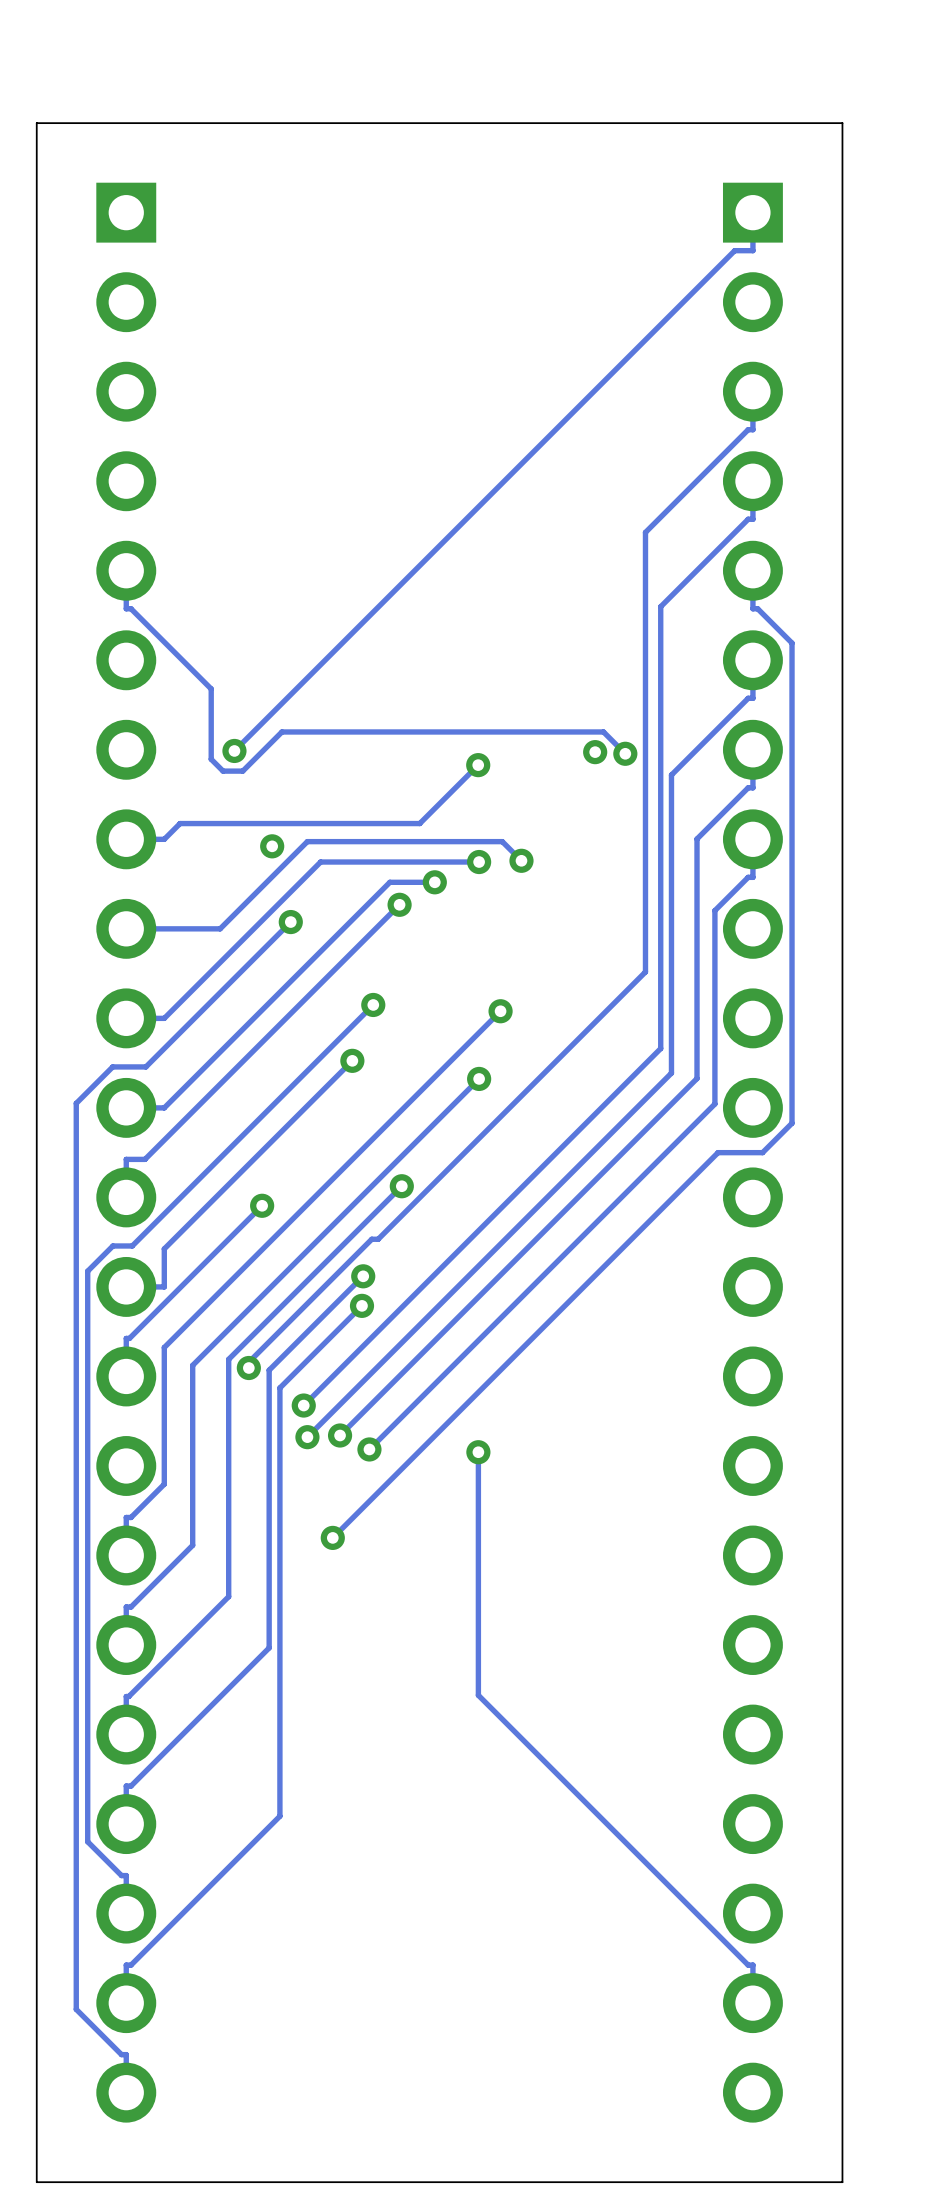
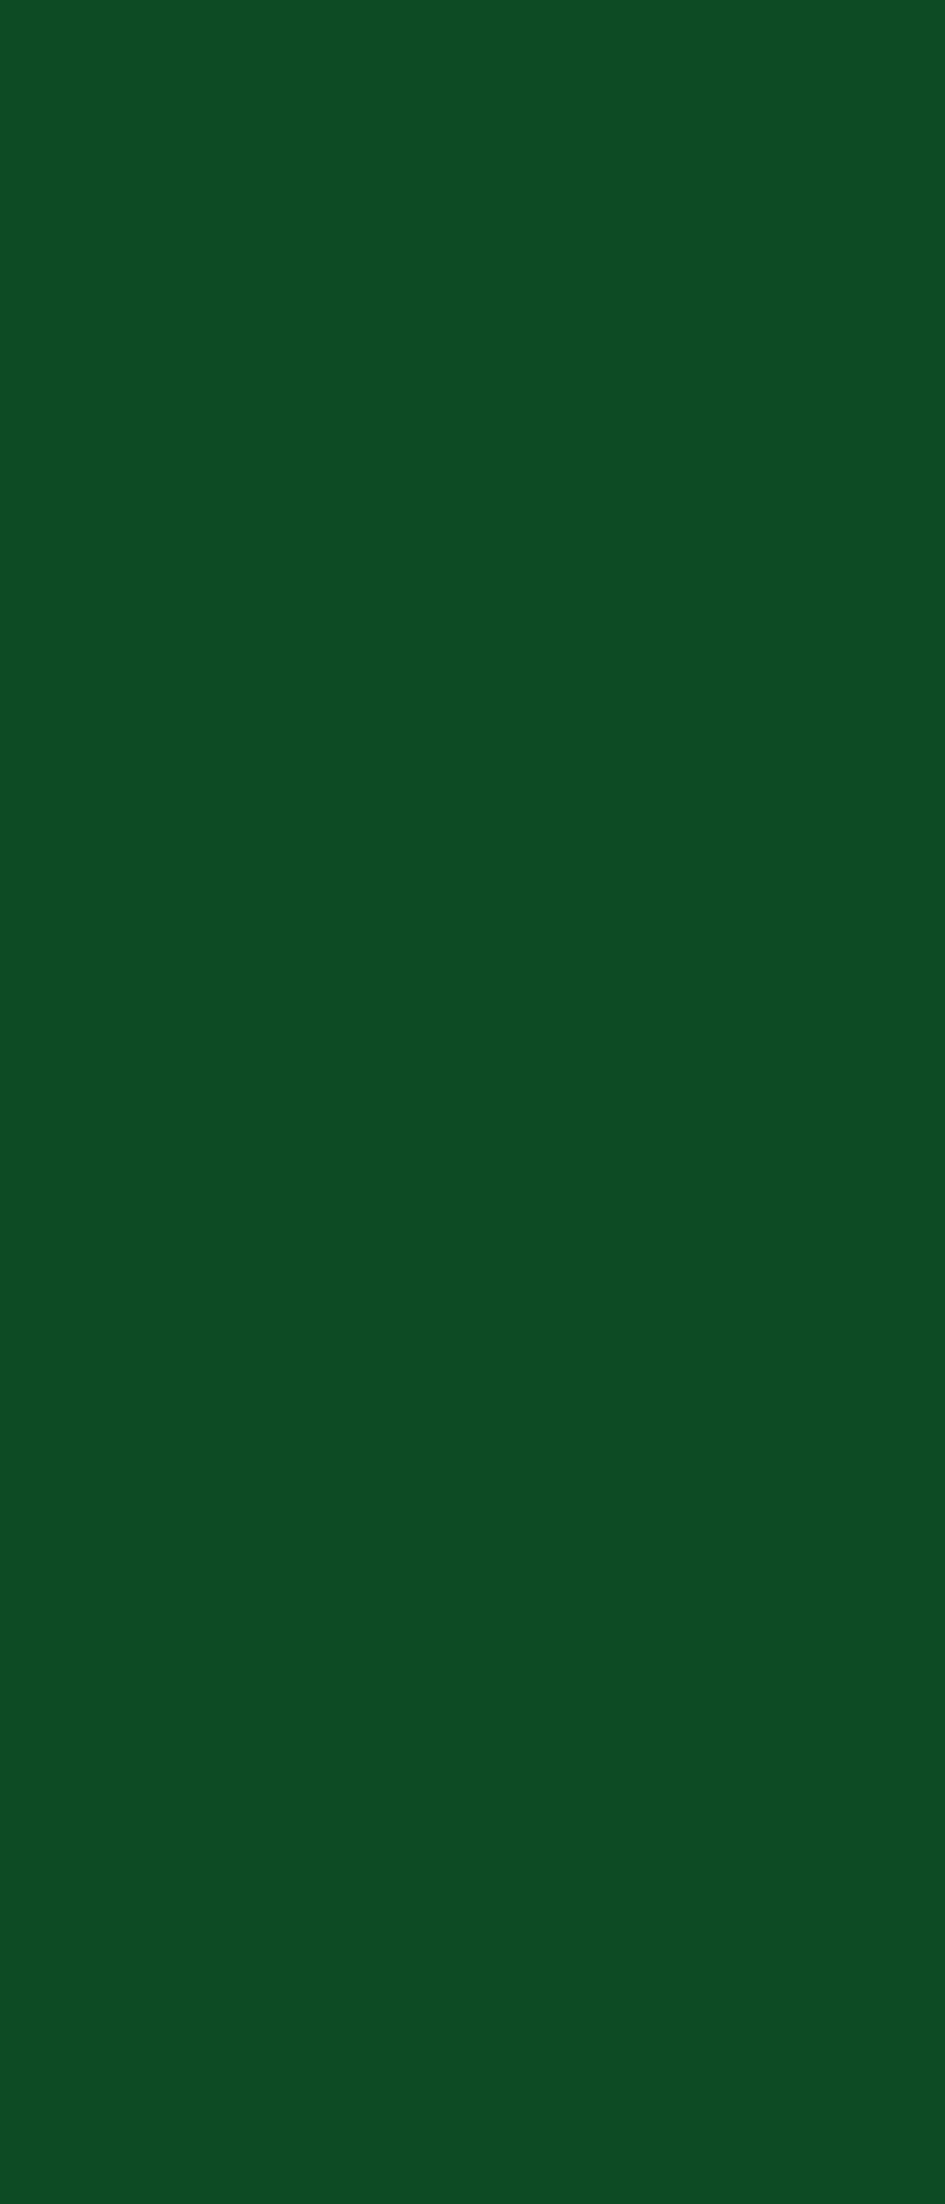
board edge: (842, 123) (842, 2182) (36, 2182) (36, 123) (842, 123) -> none
track: (752, 212) (752, 250) (734, 250) (234, 750) -> none
track: (752, 391) (752, 429) (748, 429) (645, 532) (645, 971) (378, 1239) (371, 1239) (248, 1362) (248, 1368) -> none
track: (752, 481) (752, 519) (748, 519) (660, 606) (660, 1048) (303, 1405) -> none
track: (126, 570) (126, 608) (131, 608) (211, 688) (211, 759) (223, 771) (242, 771) (281, 731) (603, 731) (625, 753) -> none
track: (752, 570) (752, 608) (757, 608) (792, 643) (792, 1123) (762, 1152) (718, 1152) (332, 1537) -> none
track: (752, 660) (752, 698) (748, 698) (671, 775) (671, 1073) (307, 1437) -> none
track: (752, 749) (752, 787) (748, 787) (697, 839) (697, 1078) (340, 1435) -> none
via: (234, 750) -> none
via: (595, 752) -> none
via: (625, 753) -> none
track: (478, 765) (419, 823) (180, 823) (164, 839) (126, 839) -> none
via: (478, 765) -> none
track: (752, 839) (752, 877) (748, 877) (714, 910) (714, 1103) (369, 1449) -> none
via: (272, 846) -> none
track: (521, 860) (502, 841) (307, 841) (220, 928) (126, 928) -> none
via: (521, 860) -> none
track: (479, 862) (320, 862) (164, 1018) (126, 1018) -> none
via: (479, 862) -> none
track: (434, 882) (389, 882) (164, 1107) (126, 1107) -> none
via: (434, 882) -> none
track: (399, 904) (144, 1159) (126, 1159) (126, 1197) -> none
via: (399, 904) -> none
track: (290, 922) (145, 1066) (112, 1066) (76, 1103) (76, 2009) (121, 2054) (126, 2054) (126, 2092) -> none
via: (290, 922) -> none
track: (373, 1004) (132, 1245) (112, 1245) (87, 1271) (87, 1841) (121, 1875) (126, 1875) (126, 1913) -> none
via: (373, 1004) -> none
track: (500, 1011) (164, 1347) (164, 1484) (131, 1517) (126, 1517) (126, 1555) -> none
via: (500, 1011) -> none
track: (352, 1060) (164, 1248) (164, 1286) (126, 1286) -> none
via: (352, 1060) -> none
track: (479, 1078) (192, 1365) (192, 1545) (131, 1607) (126, 1607) (126, 1645) -> none
via: (479, 1078) -> none
part: (126, 1152) -> none
part: (752, 1152) -> none
track: (401, 1186) (228, 1359) (228, 1596) (128, 1696) (126, 1696) (126, 1734) -> none
via: (401, 1186) -> none
track: (262, 1205) (129, 1338) (126, 1338) (126, 1376) -> none
via: (262, 1205) -> none
track: (363, 1276) (269, 1370) (269, 1647) (131, 1786) (126, 1786) (126, 1824) -> none
via: (363, 1276) -> none
track: (362, 1305) (279, 1387) (279, 1816) (131, 1965) (126, 1965) (126, 2003) -> none
via: (362, 1305) -> none
via: (248, 1368) -> none
via: (303, 1405) -> none
via: (340, 1435) -> none
via: (307, 1437) -> none
via: (369, 1449) -> none
track: (478, 1452) (478, 1695) (748, 1965) (752, 1965) (752, 2003) -> none
via: (478, 1452) -> none
via: (332, 1537) -> none

